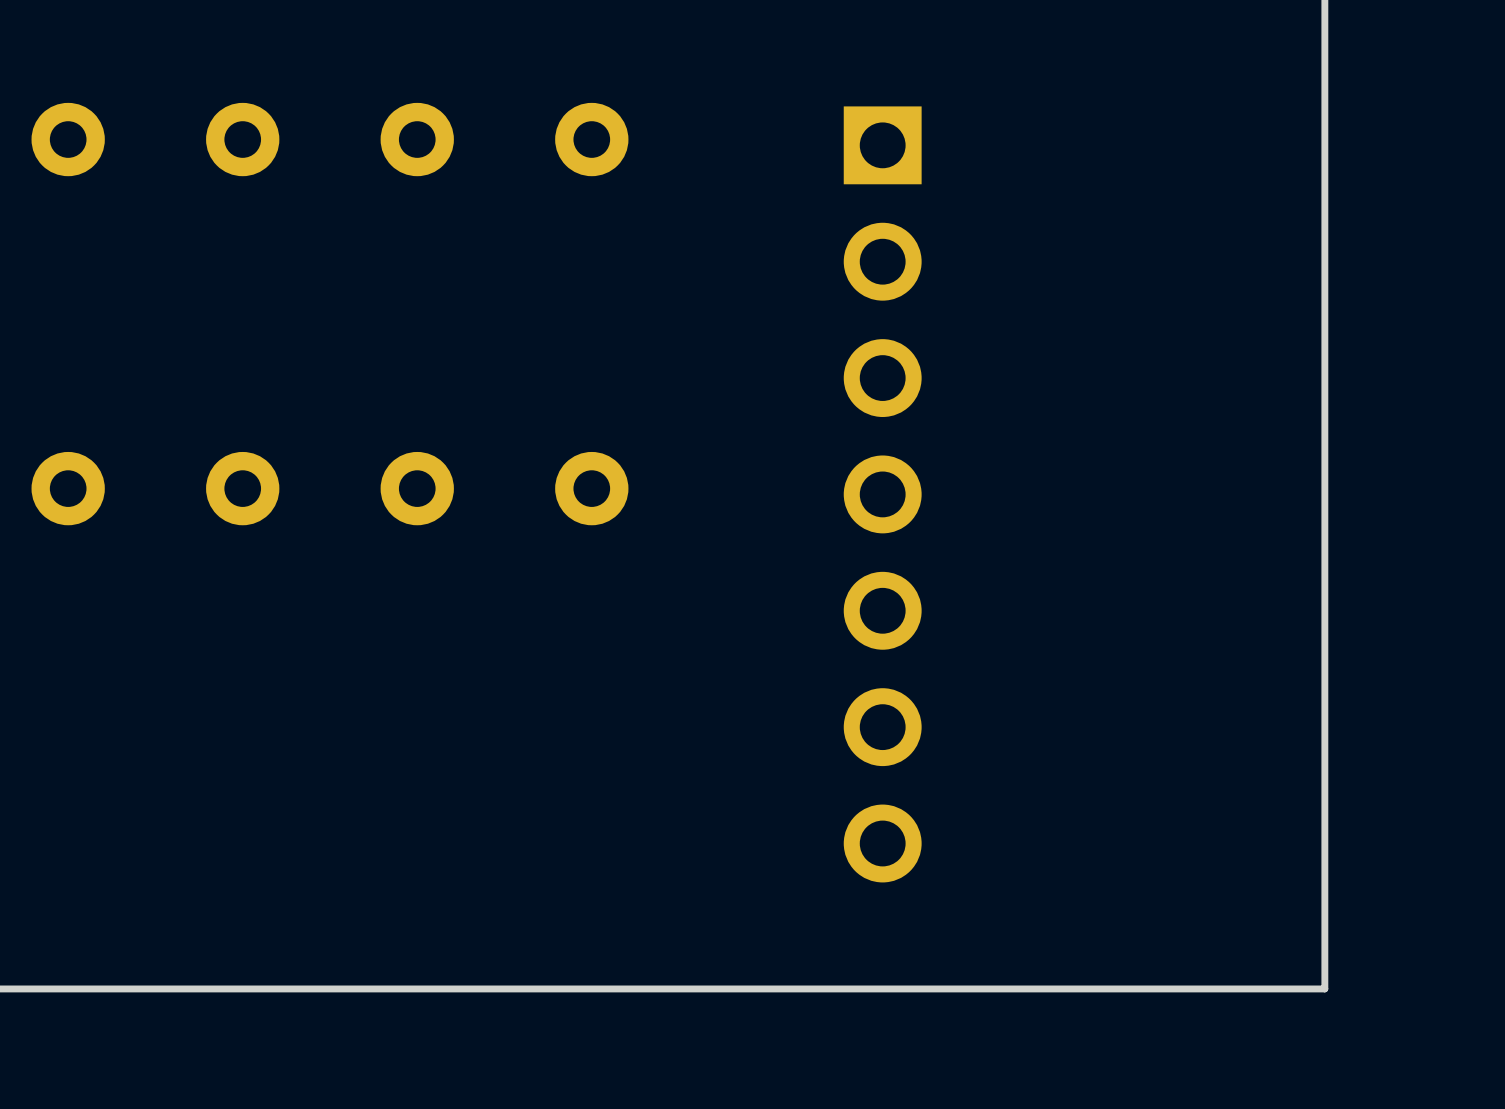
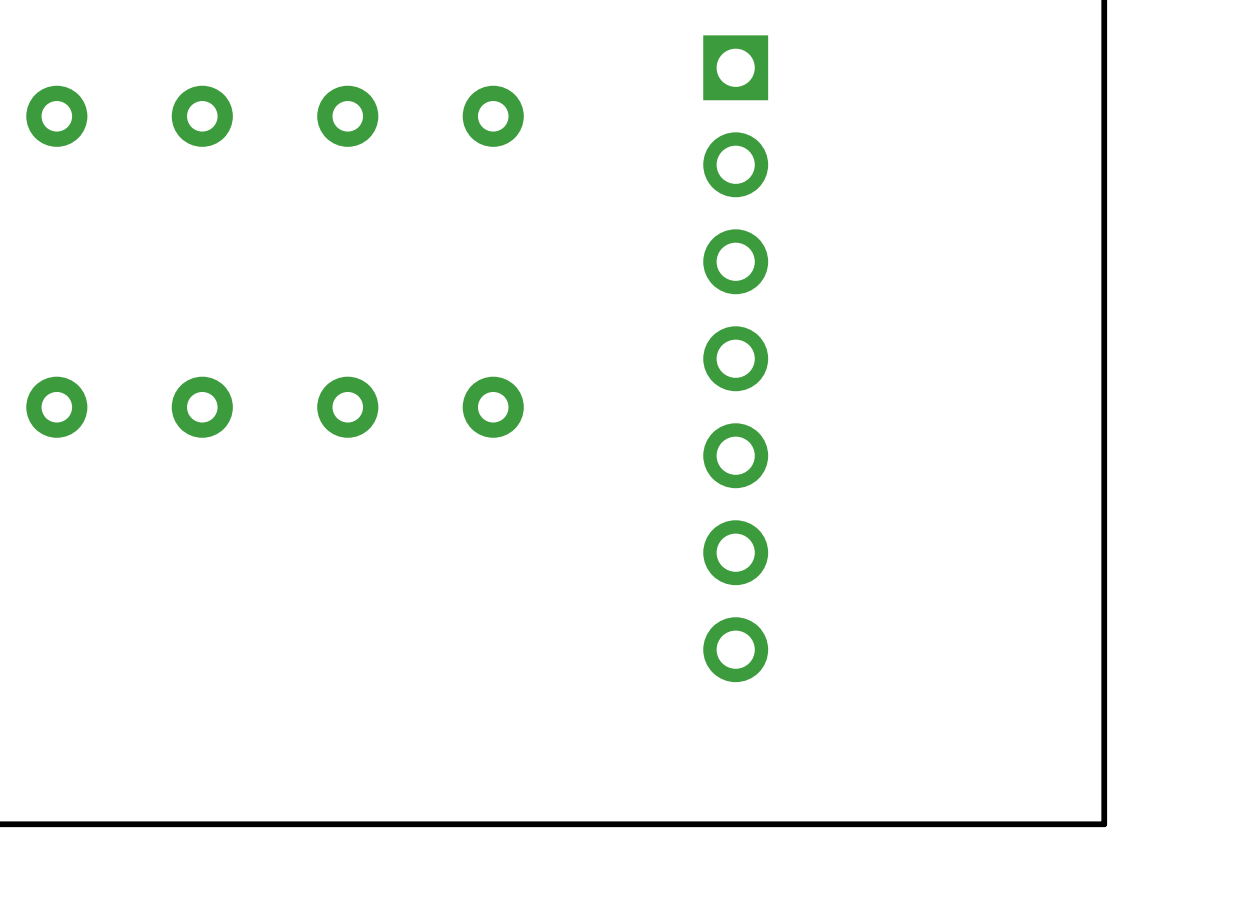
part position: (882, 494) -> (735, 358)

